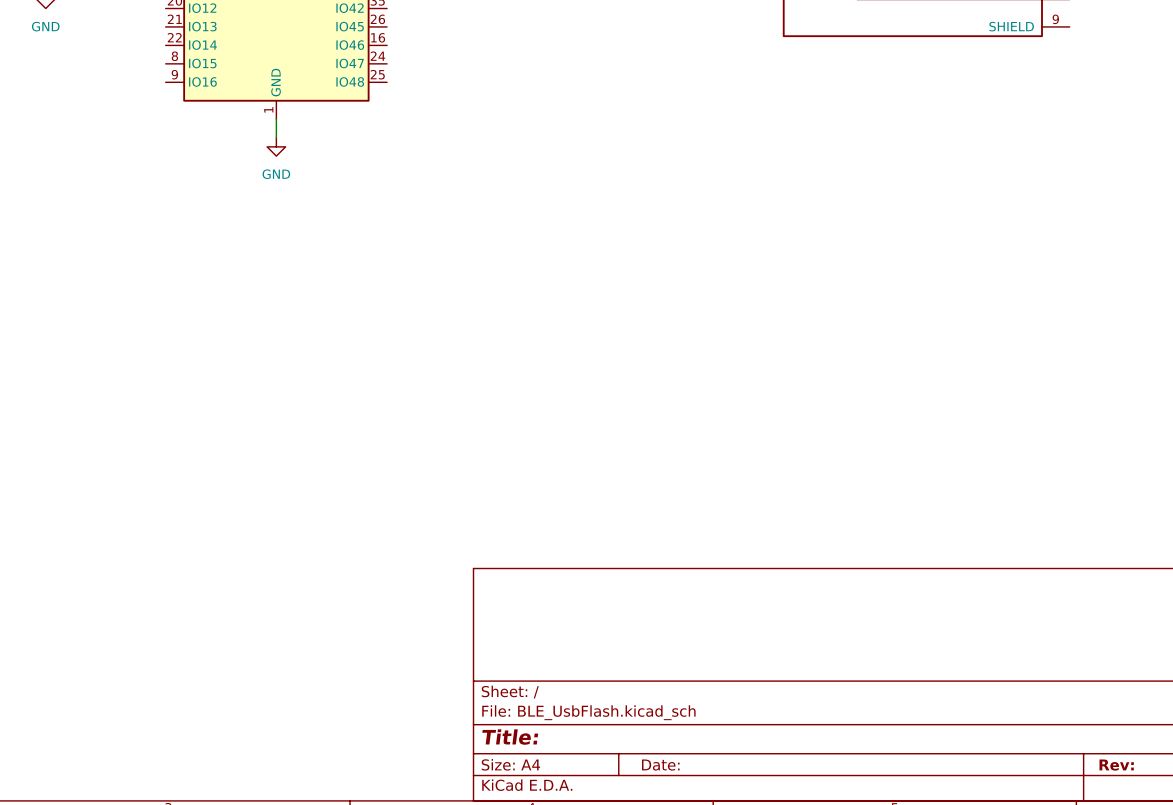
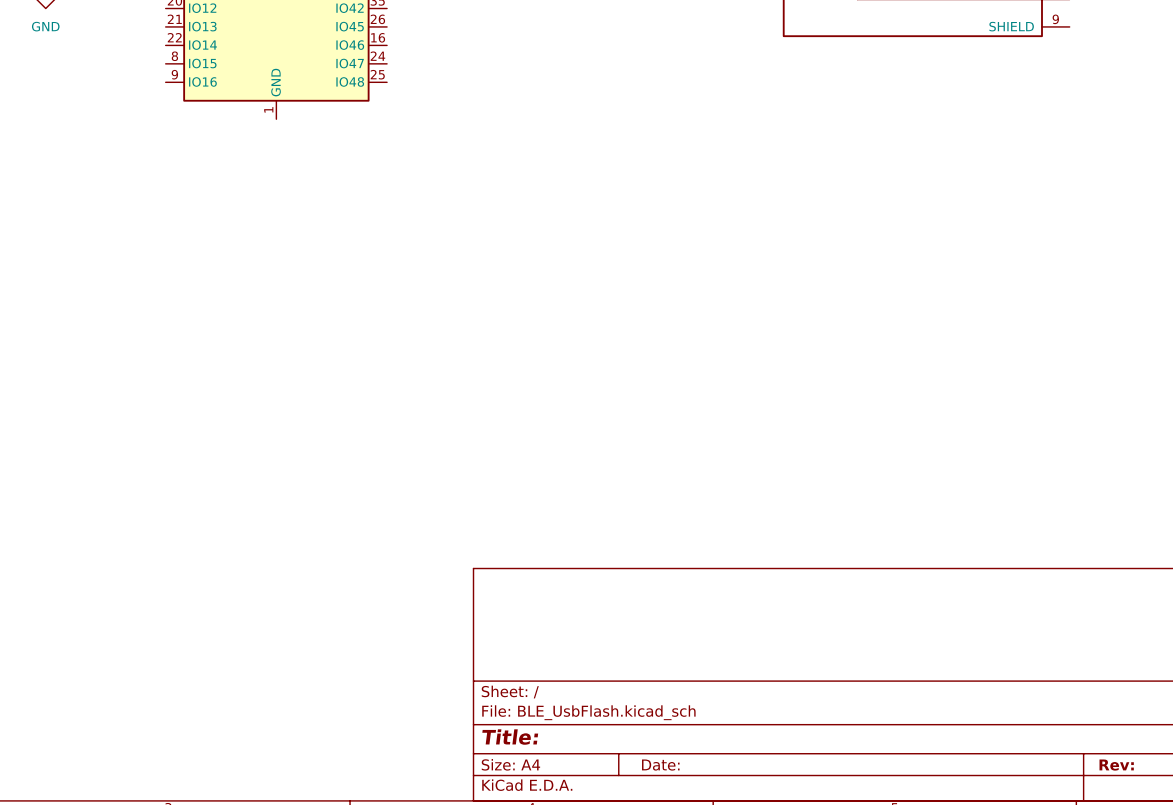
wire: (276, 119) (276, 137) -> none
power symbol: GND (276, 146) -> none

